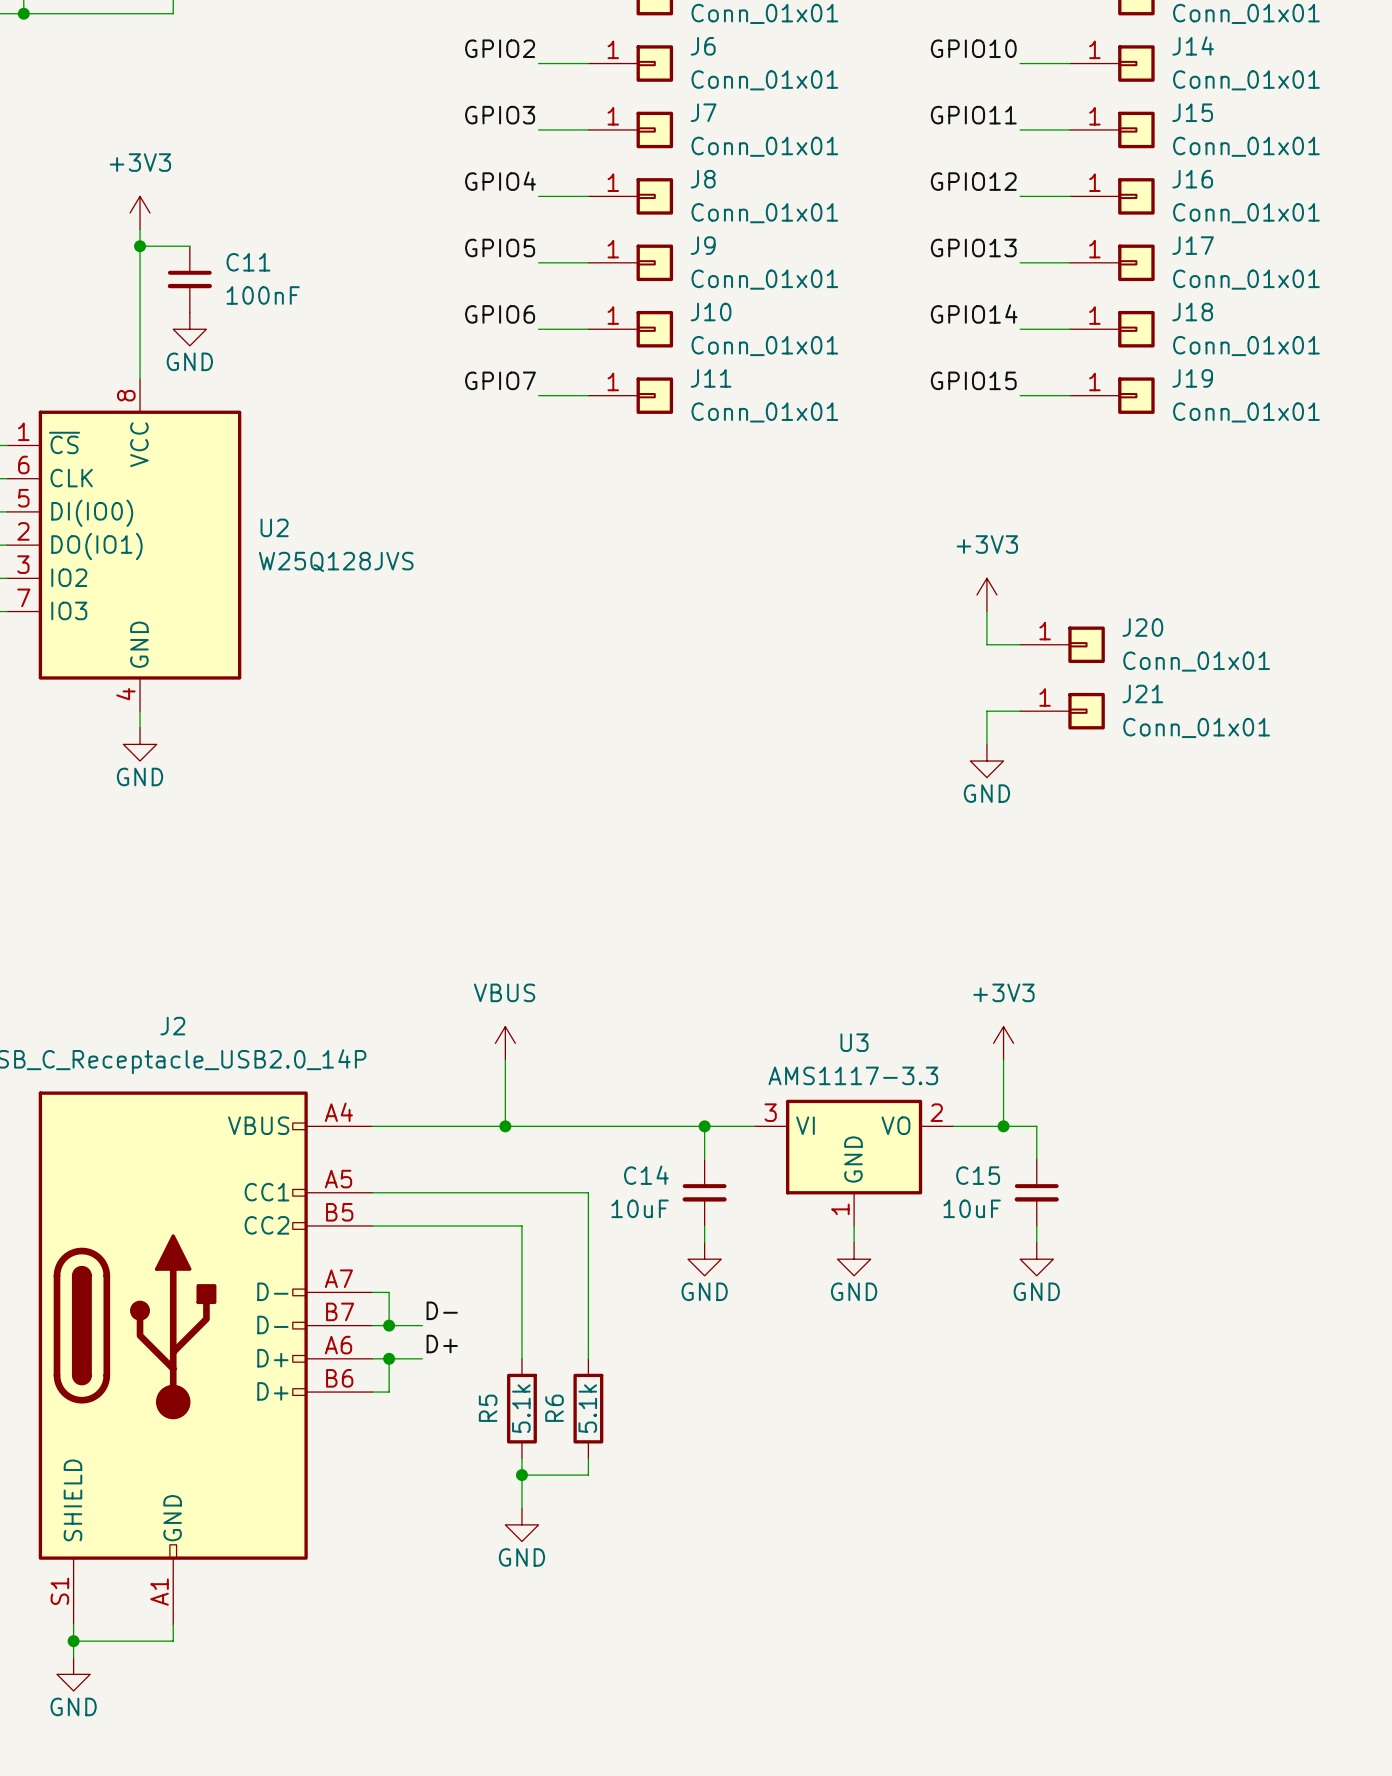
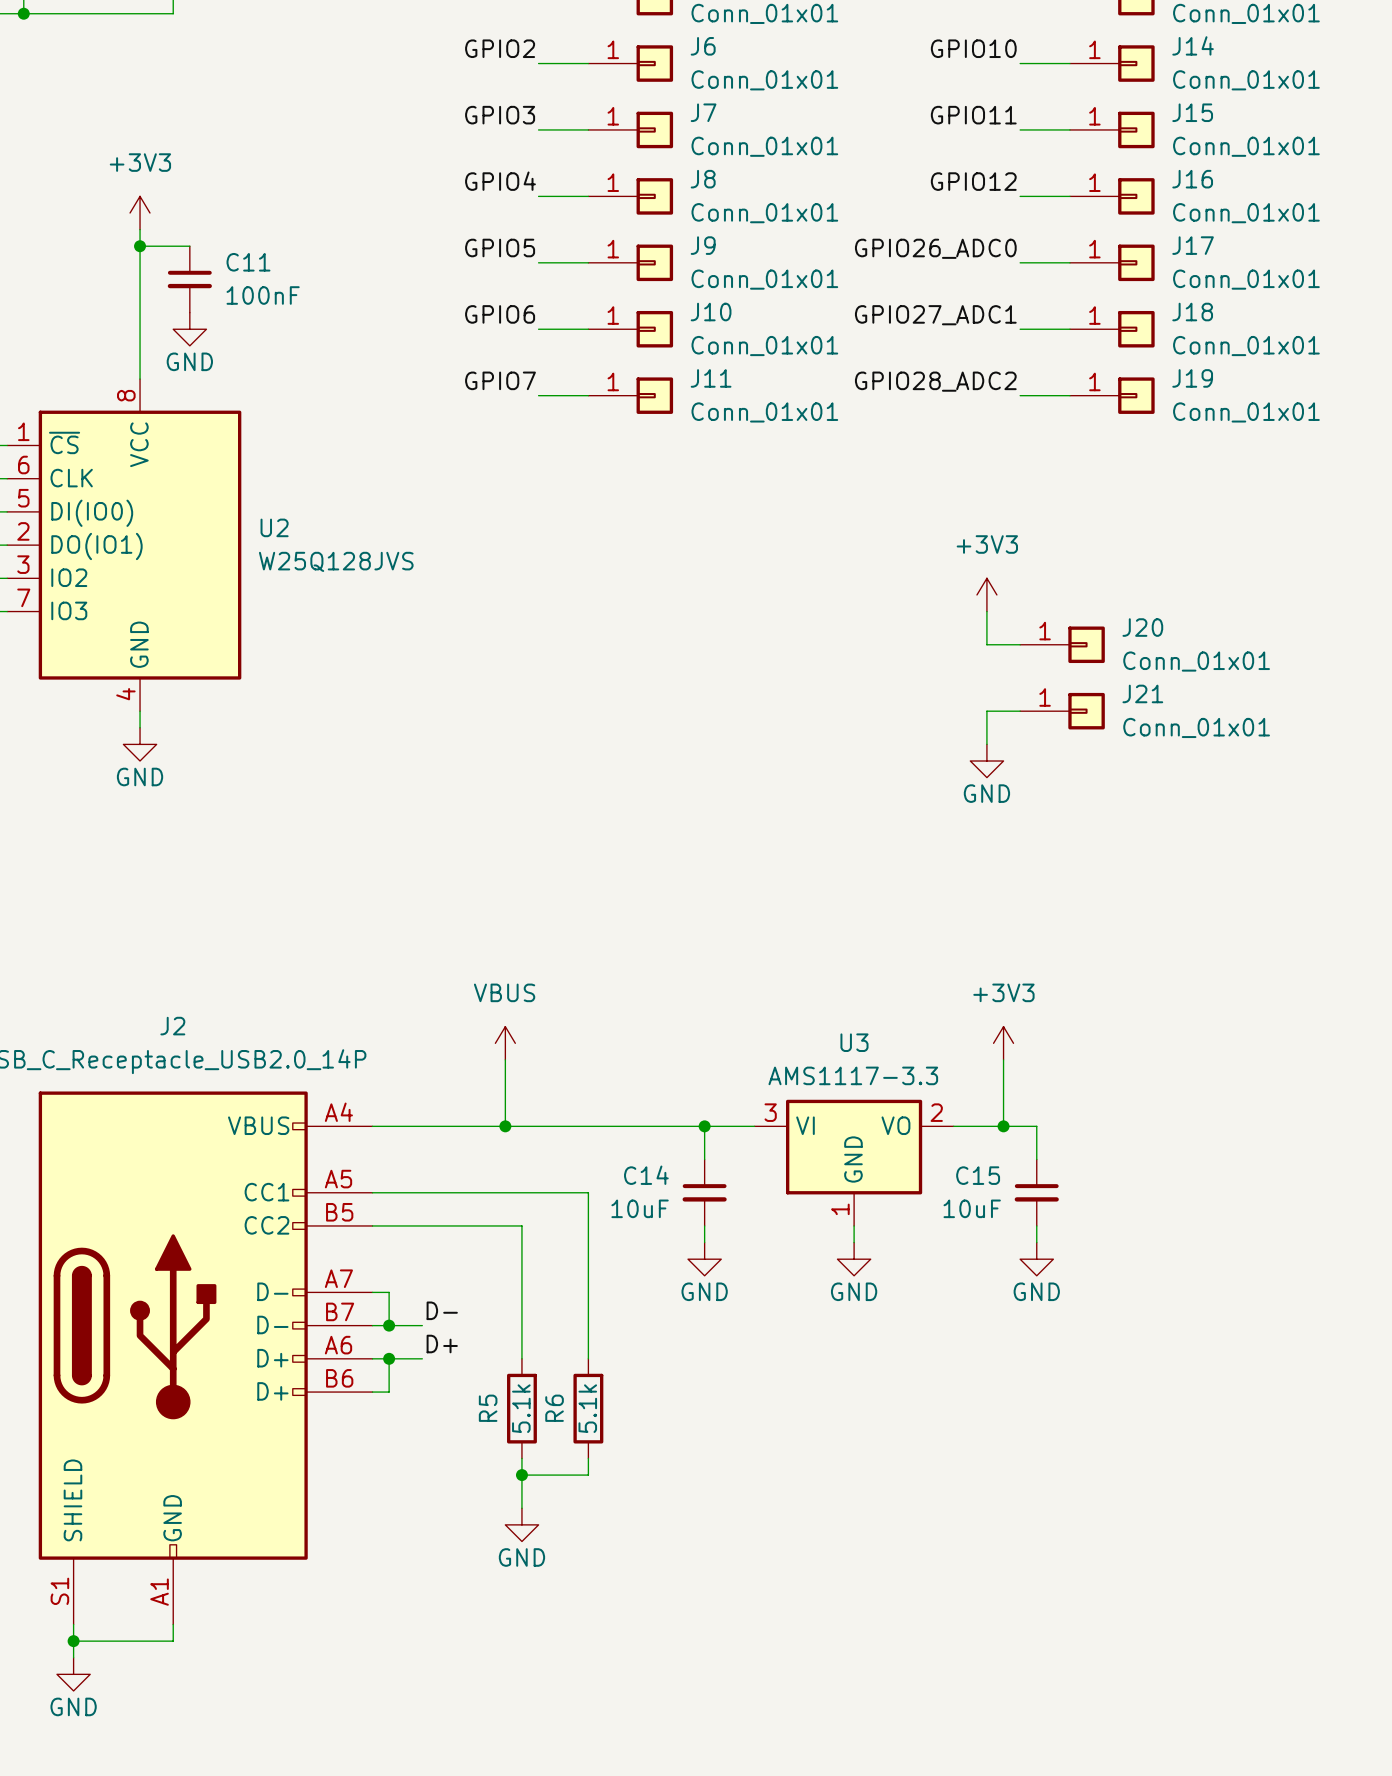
label: GPIO13 (973, 248) -> GPIO26_ADC0 (935, 248)
label: GPIO14 (974, 314) -> GPIO27_ADC1 (935, 315)
label: GPIO15 (973, 380) -> GPIO28_ADC2 (935, 381)

